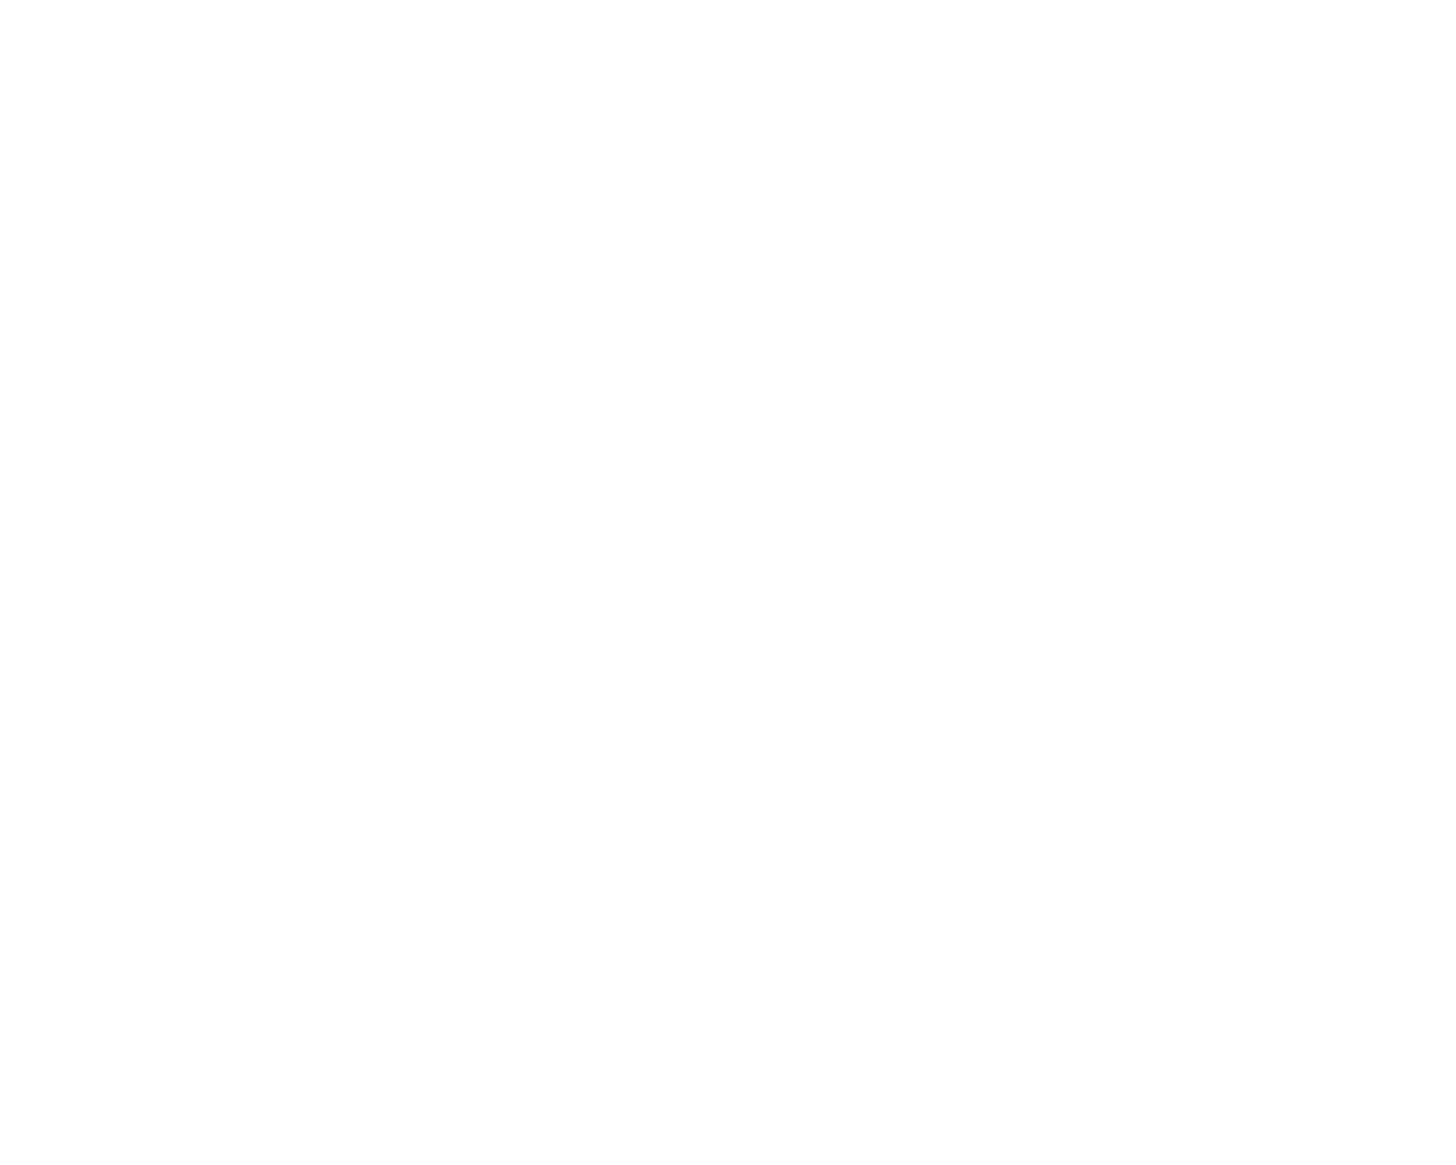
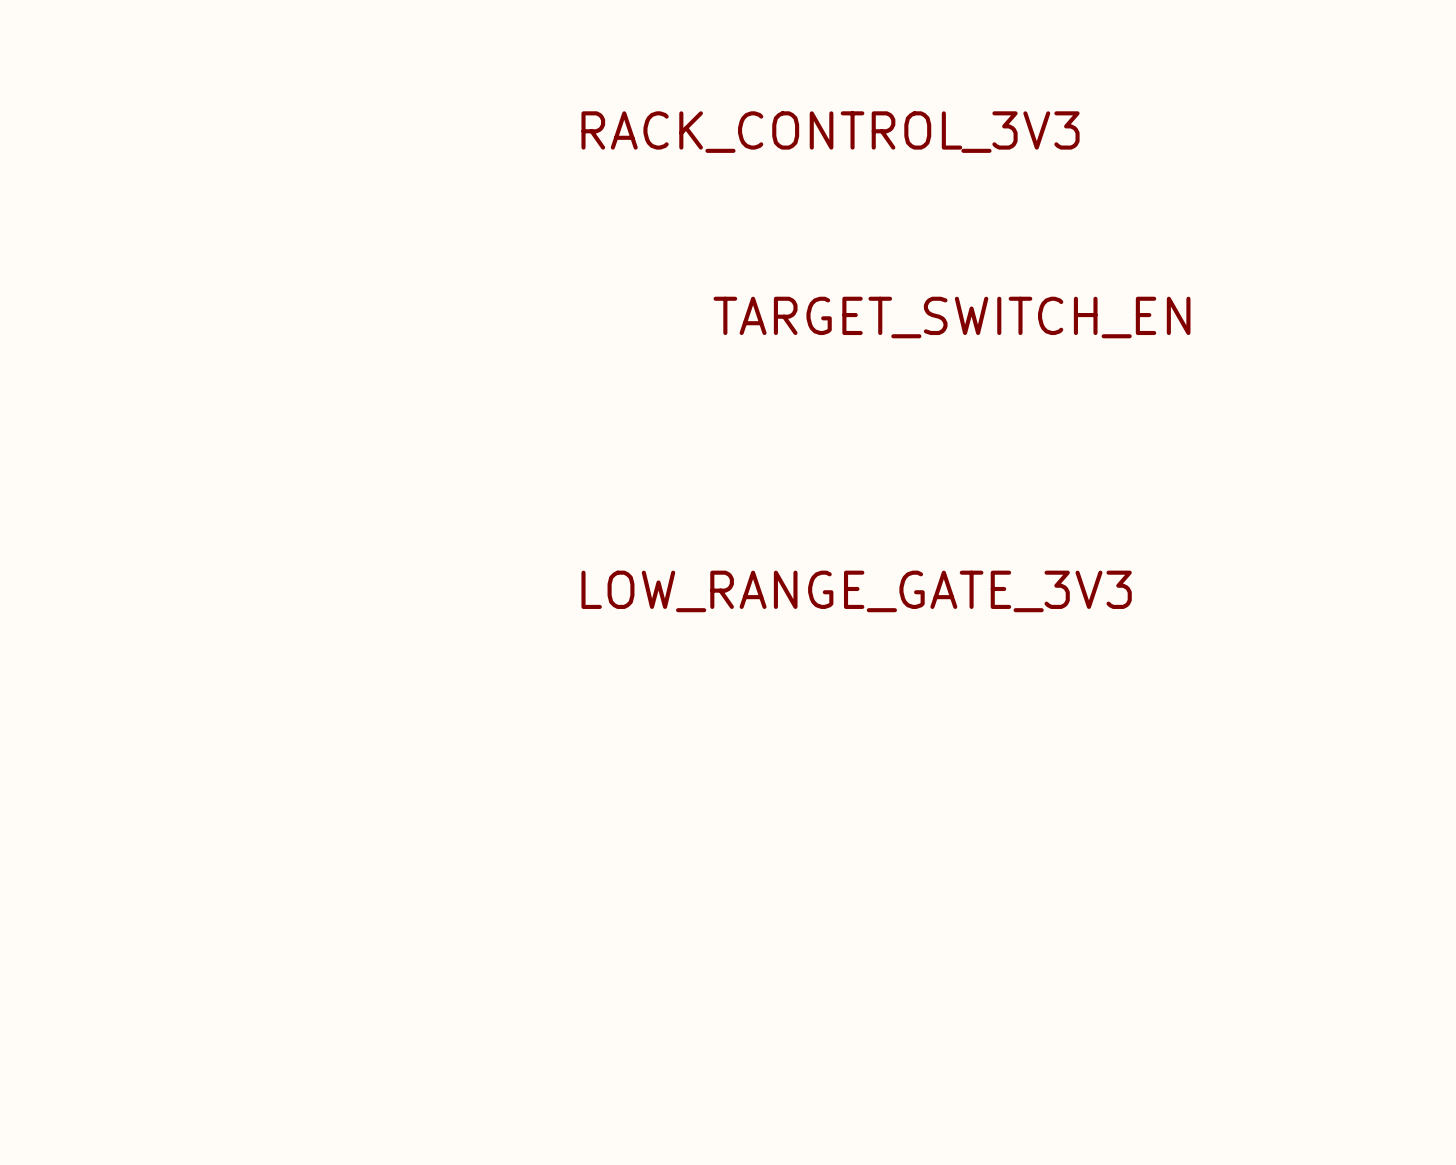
label: none -> RACK_CONTROL_3V3 (830, 132)
label: none -> TARGET_SWITCH_EN (952, 317)
label: none -> LOW_RANGE_GATE_3V3 (856, 591)

